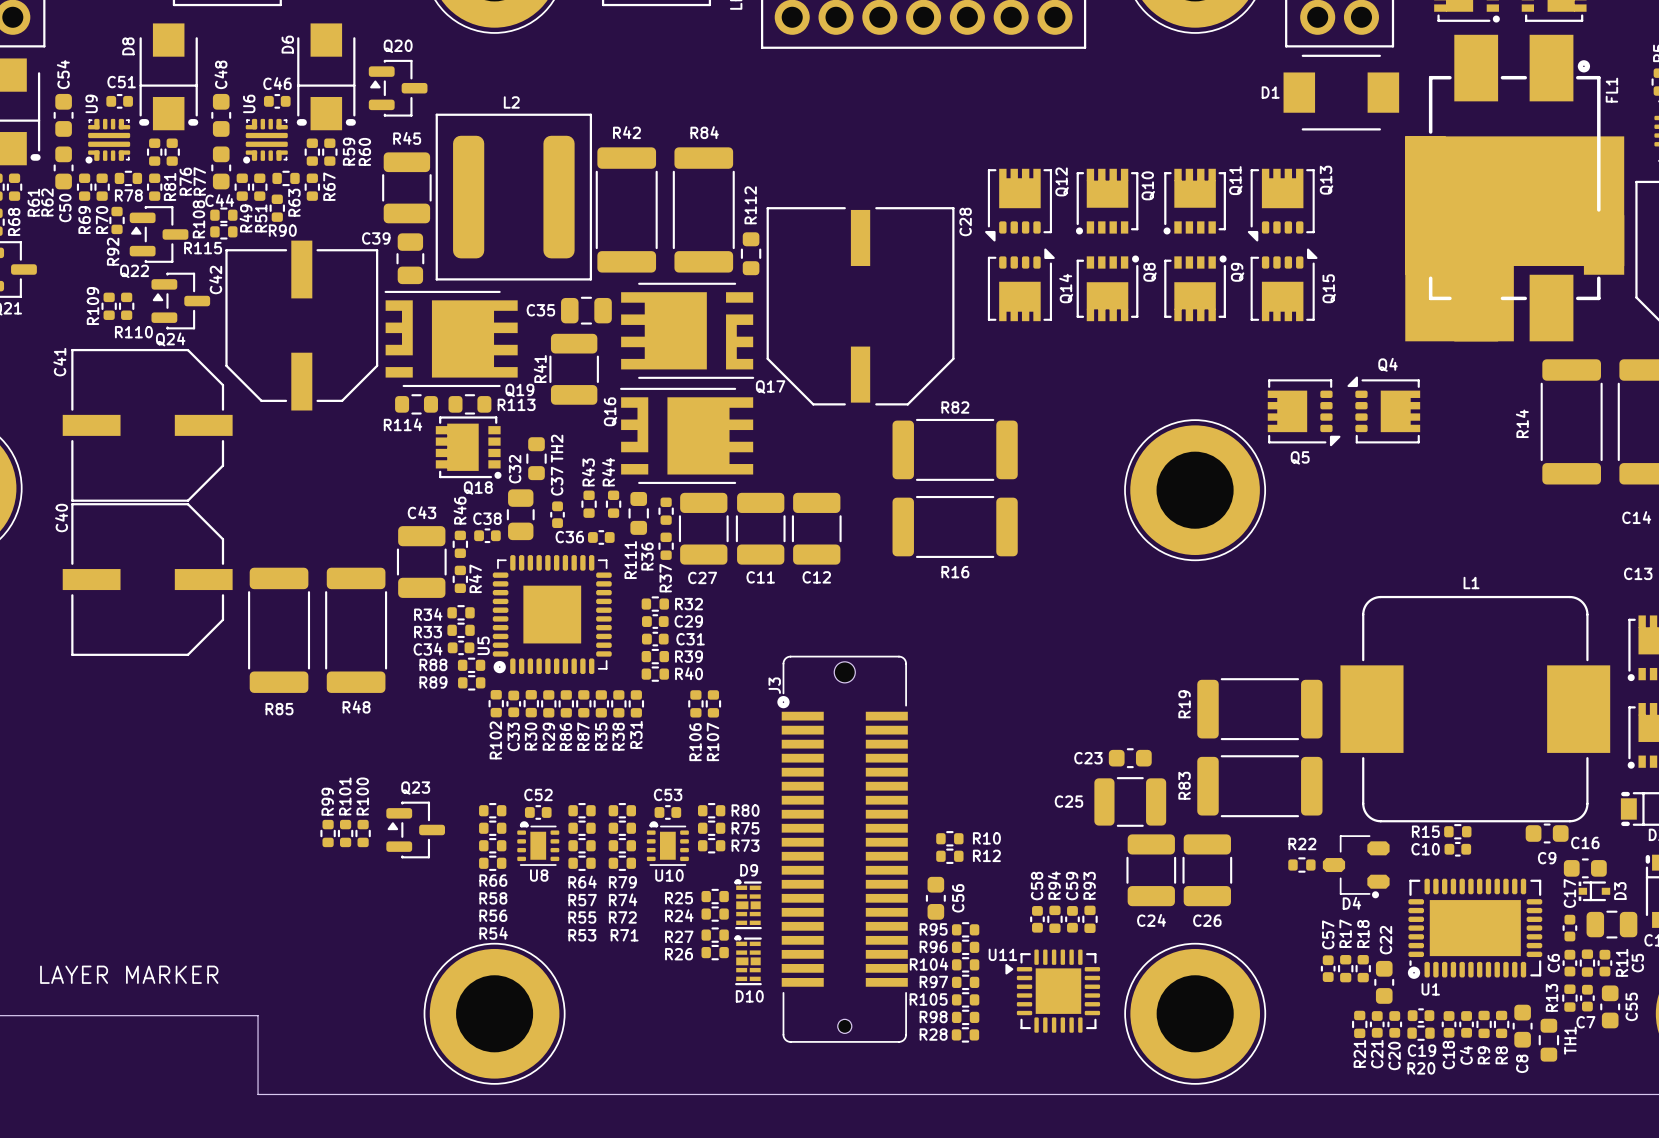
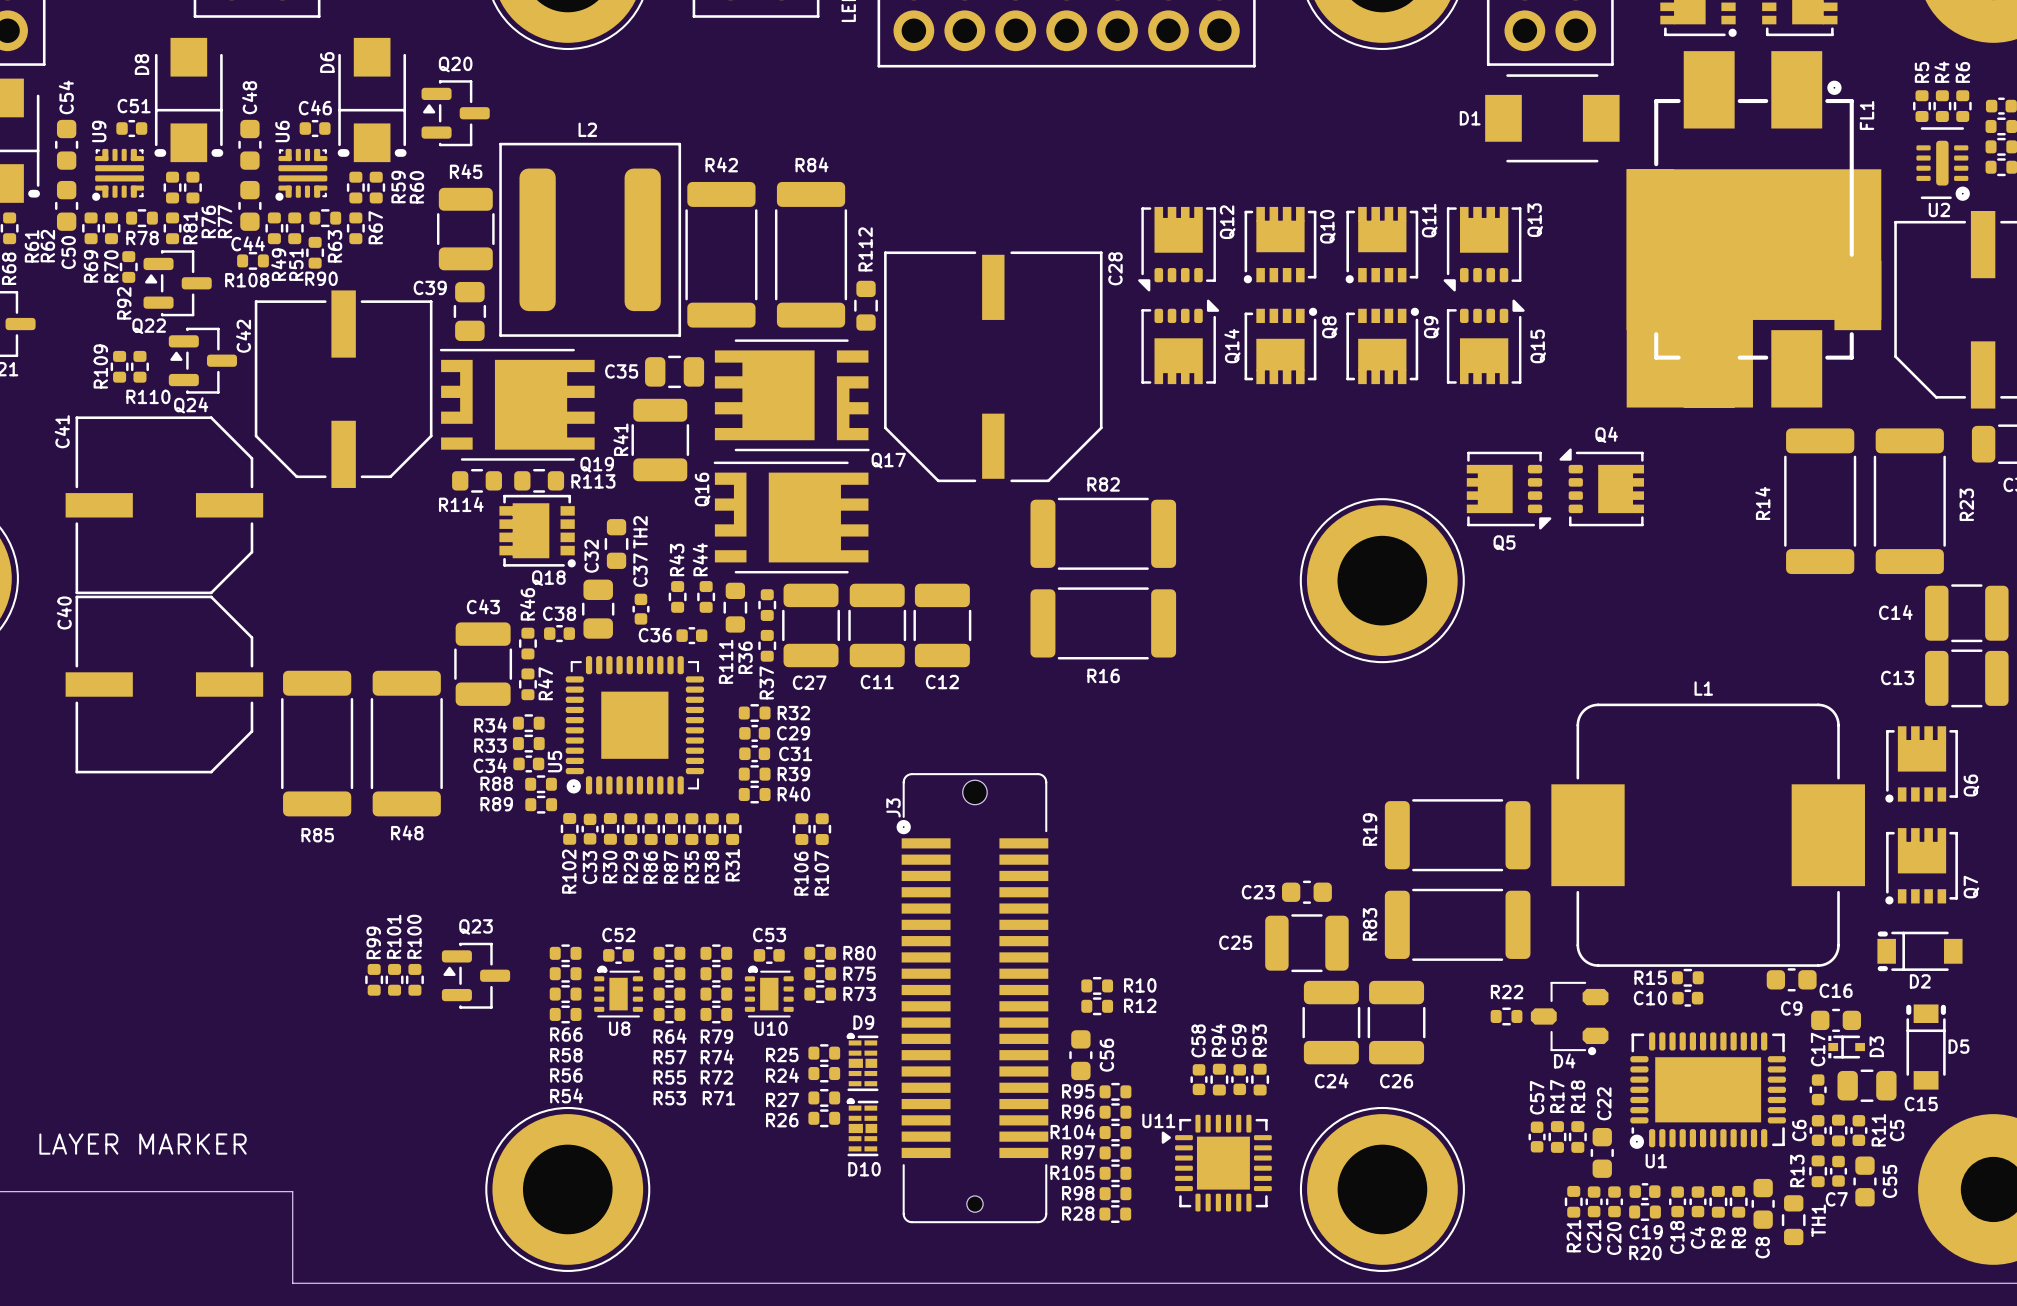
R108 name rotation: 0° (198, 219) -> 90° clockwise (247, 280)
R115: (223, 231) -> none

